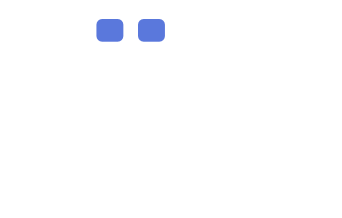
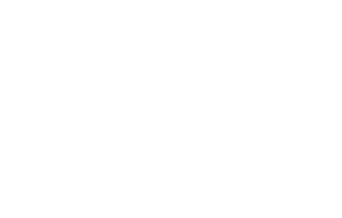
part: (130, 30) -> none

